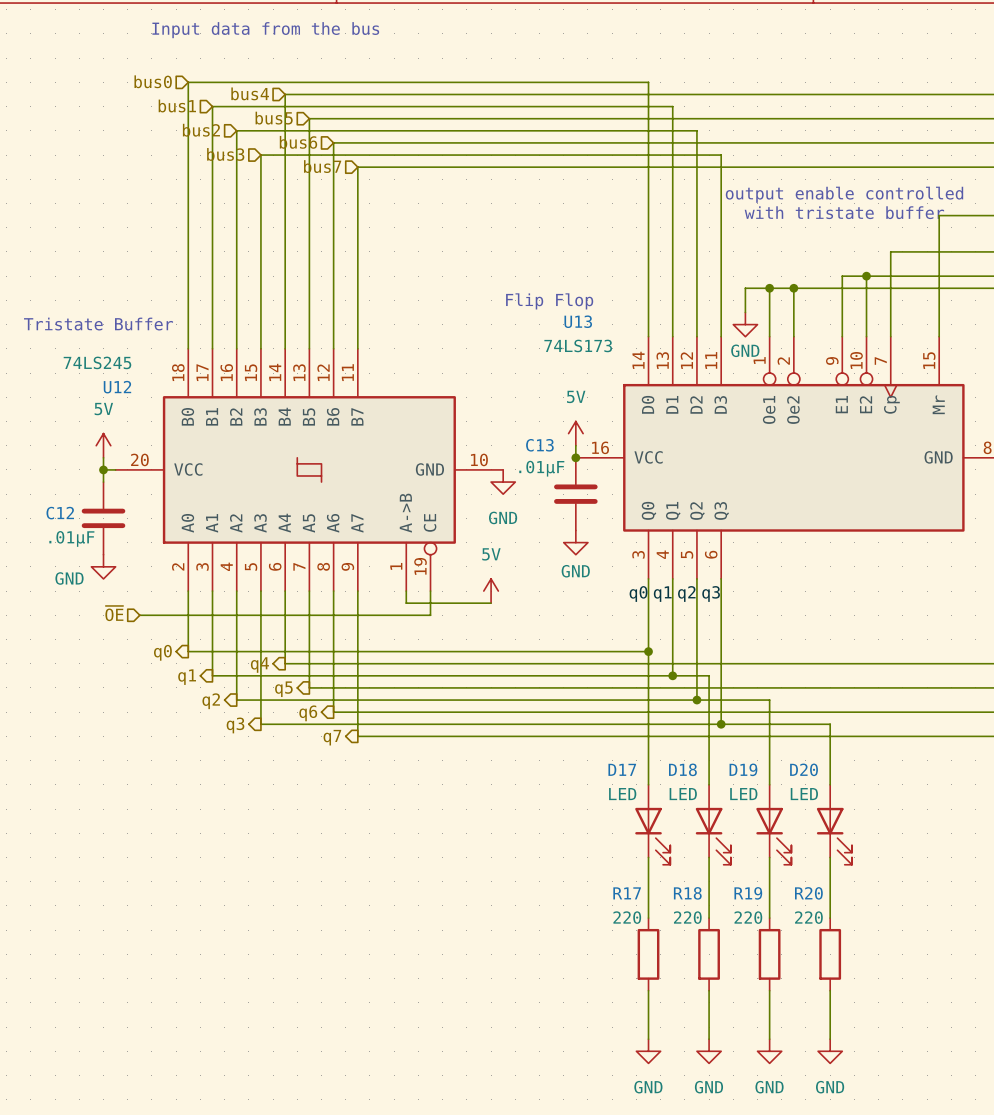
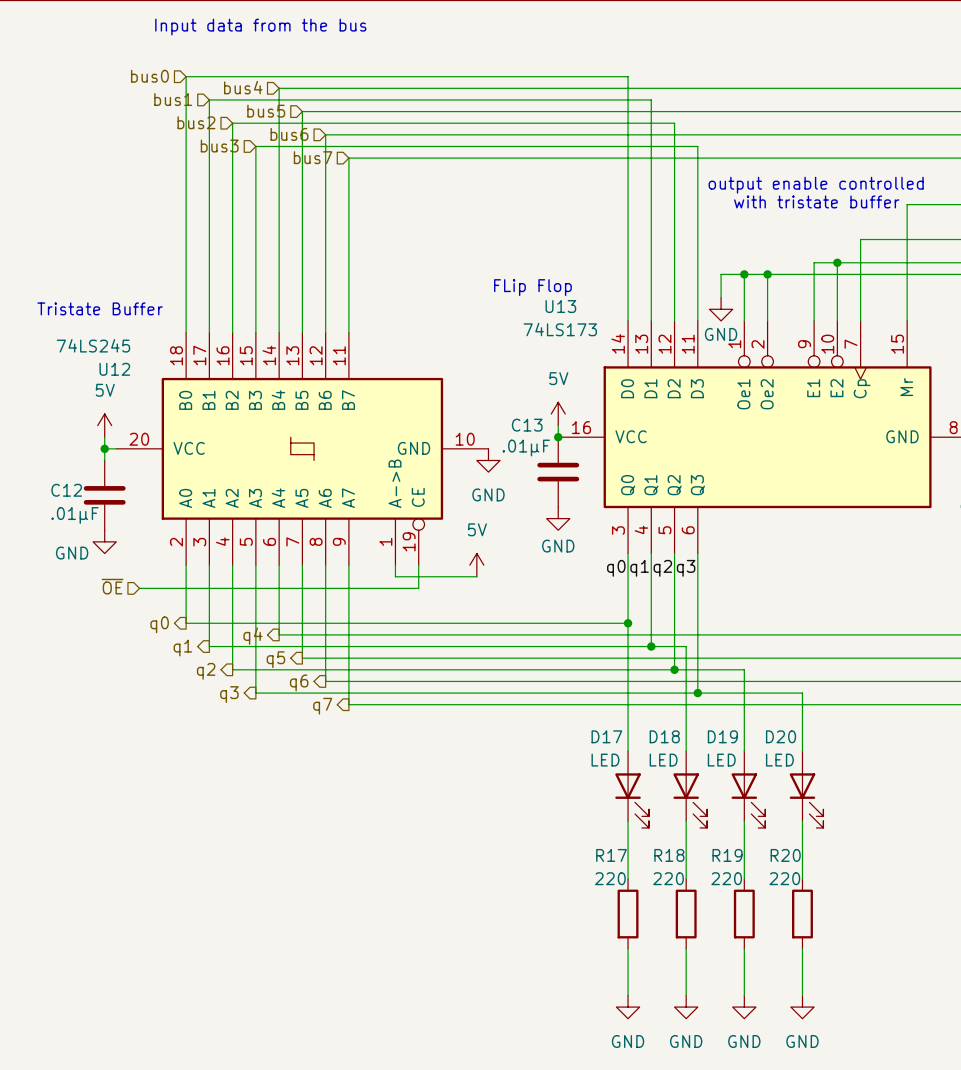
text: Flip Flop (549, 301) -> FLip Flop (532, 287)

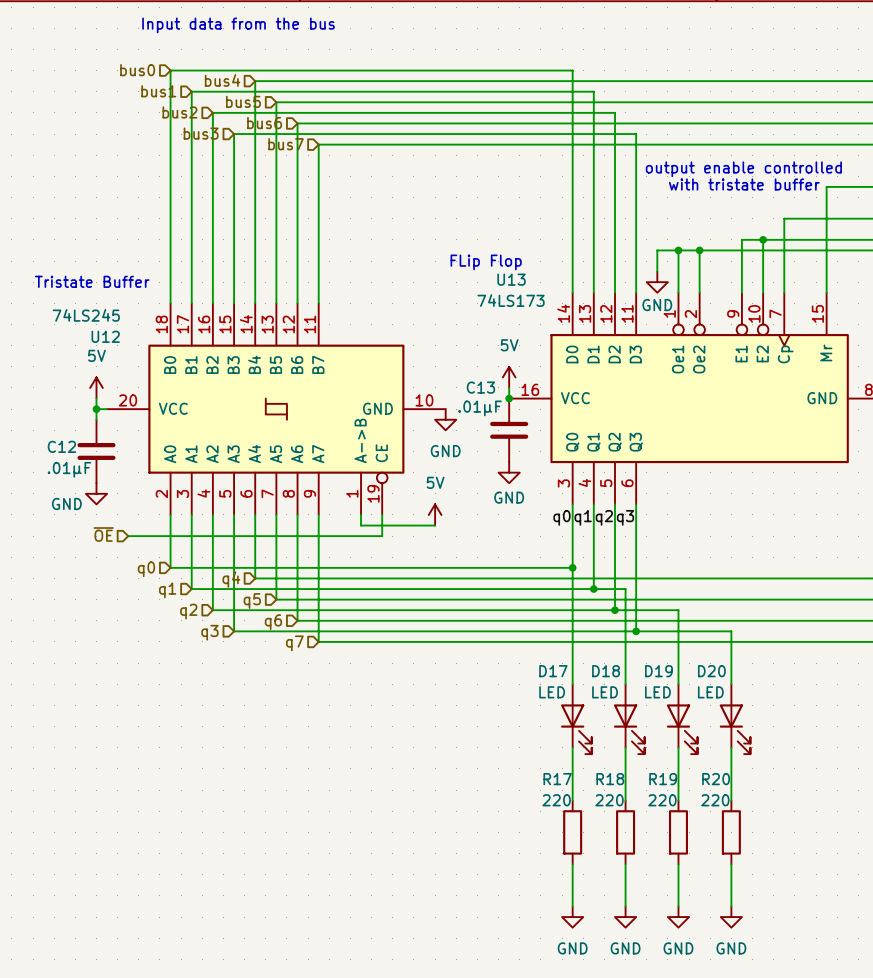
hierarchical label shape: output (159, 624) -> input (146, 569)
hierarchical label shape: output (252, 636) -> input (231, 579)
hierarchical label shape: output (182, 648) -> input (167, 590)
hierarchical label shape: output (275, 659) -> input (252, 600)
hierarchical label shape: output (206, 671) -> input (188, 611)
hierarchical label shape: output (299, 682) -> input (273, 622)
hierarchical label shape: output (229, 694) -> input (209, 632)
hierarchical label shape: output (322, 706) -> input (294, 643)

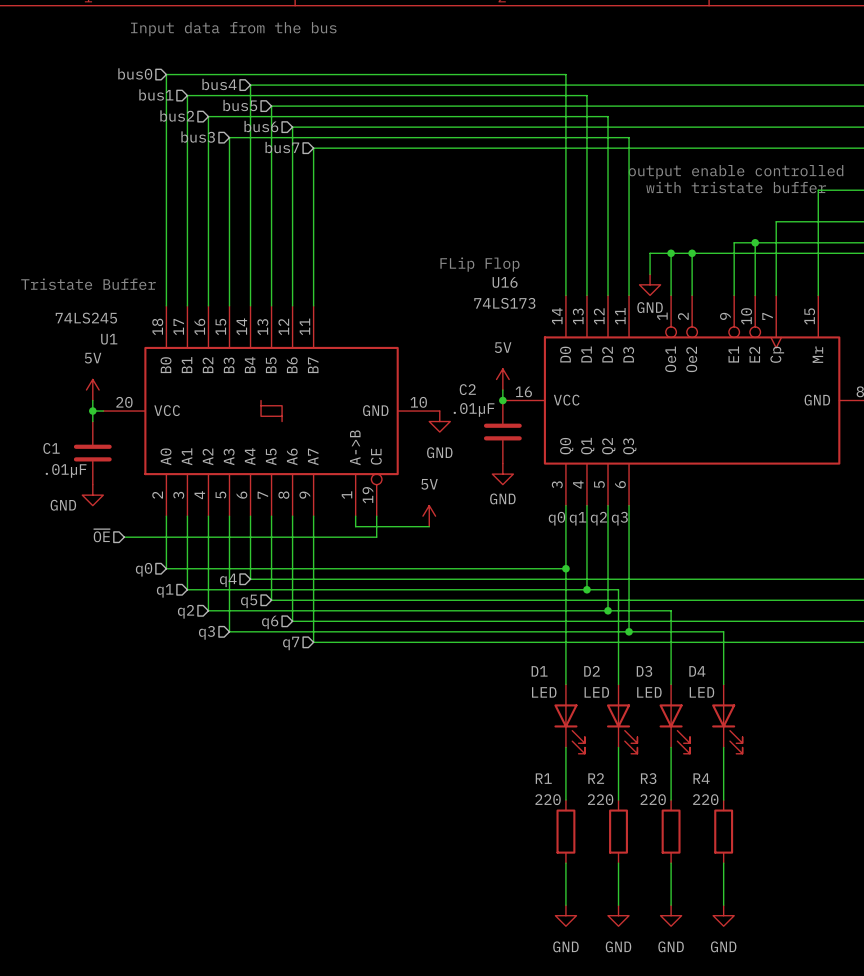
U13 name: U13 (511, 279) -> U16 (505, 282)
U12 name: U12 (105, 336) -> U1 (109, 339)
C13 name: C13 (480, 387) -> C2 (467, 389)
C12 name: C12 (61, 446) -> C1 (51, 448)
D17 name: D17 (553, 671) -> D1 (539, 671)
D18 name: D18 (606, 671) -> D2 (592, 671)
D19 name: D19 (658, 671) -> D3 (644, 671)
D20 name: D20 (711, 671) -> D4 (697, 671)
R17 name: R17 (557, 779) -> R1 (543, 778)
R18 name: R18 (610, 779) -> R2 (596, 778)
R19 name: R19 (663, 779) -> R3 (648, 778)
R20 name: R20 (716, 779) -> R4 (701, 778)

